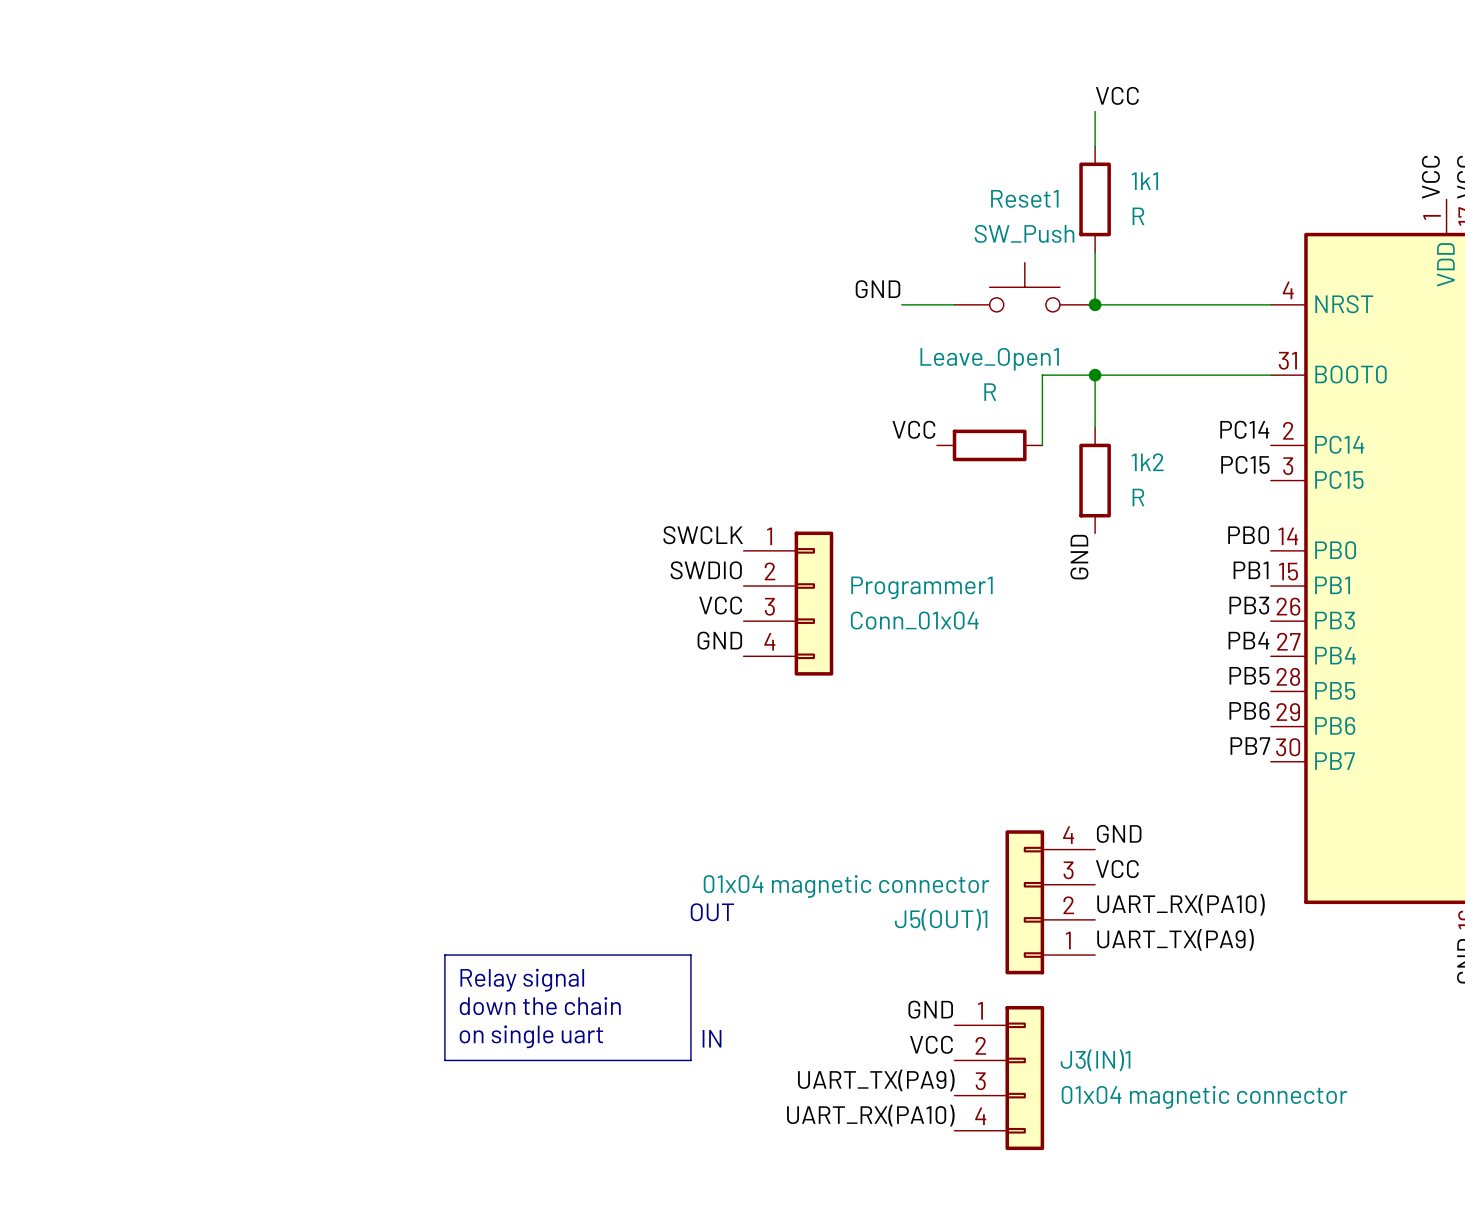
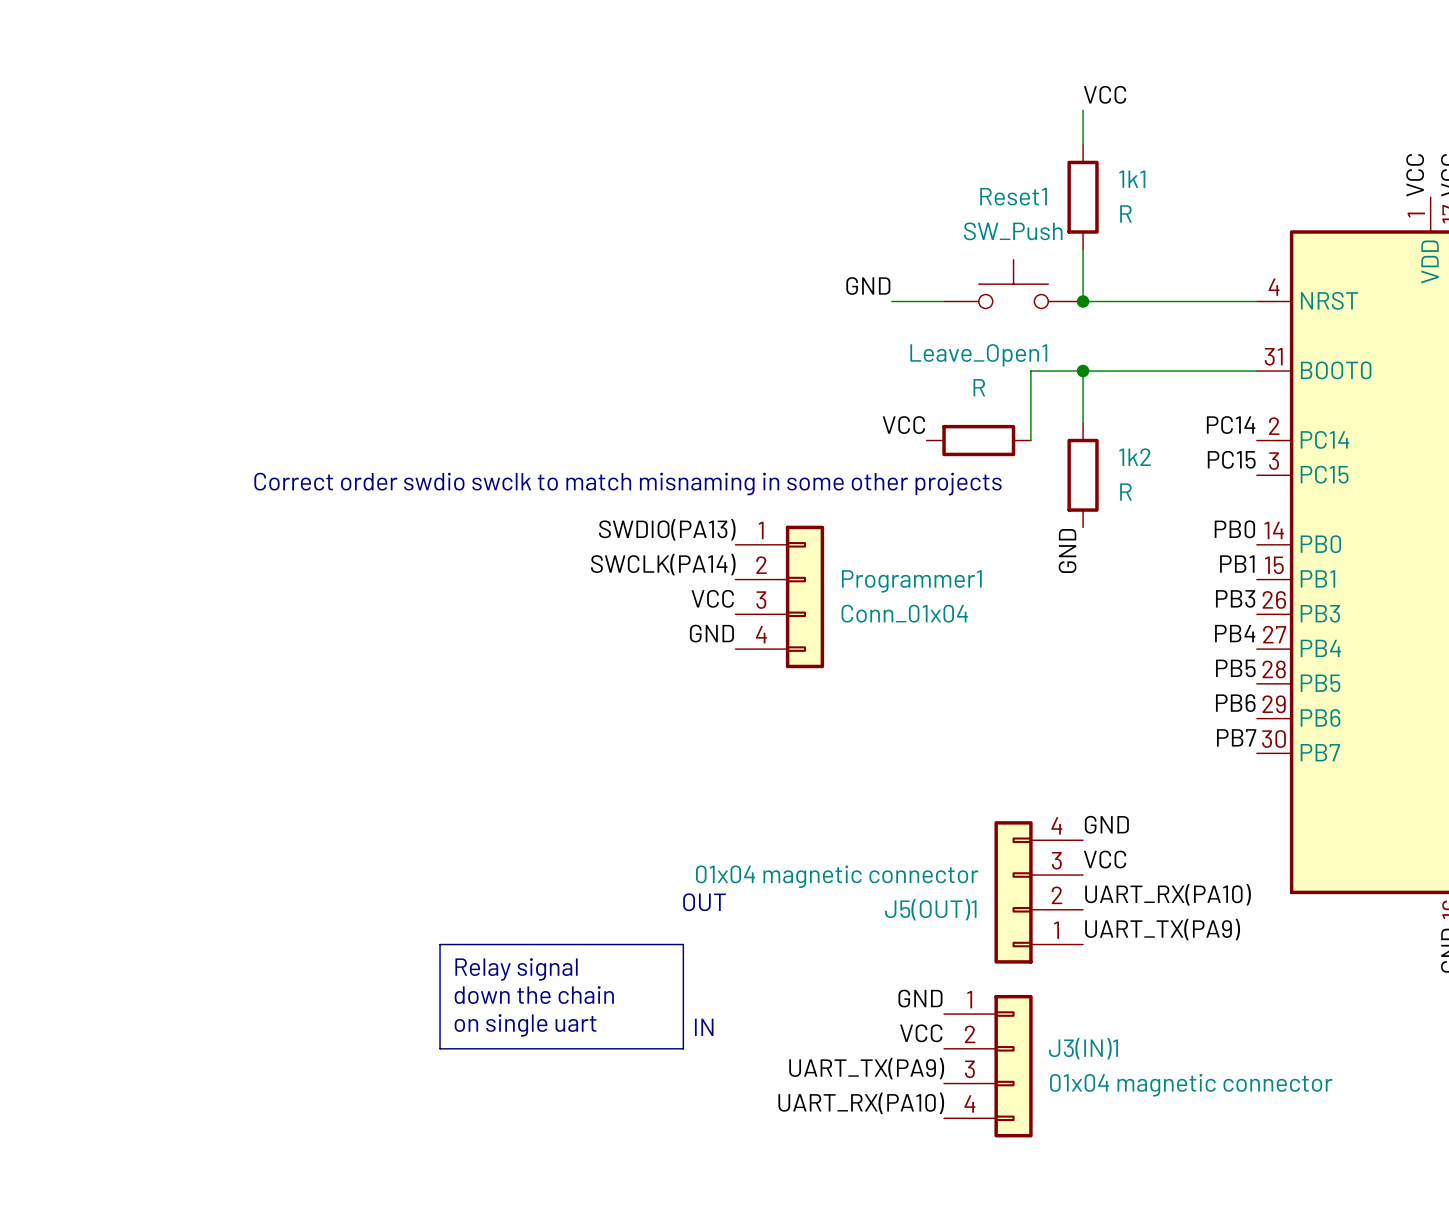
text: none -> Correct order swdio swclk to match misnaming in some other projects (628, 484)
label: SWCLK (703, 535) -> SWDIO(PA13) (667, 529)
label: SWDIO (706, 570) -> SWCLK(PA14) (663, 564)

